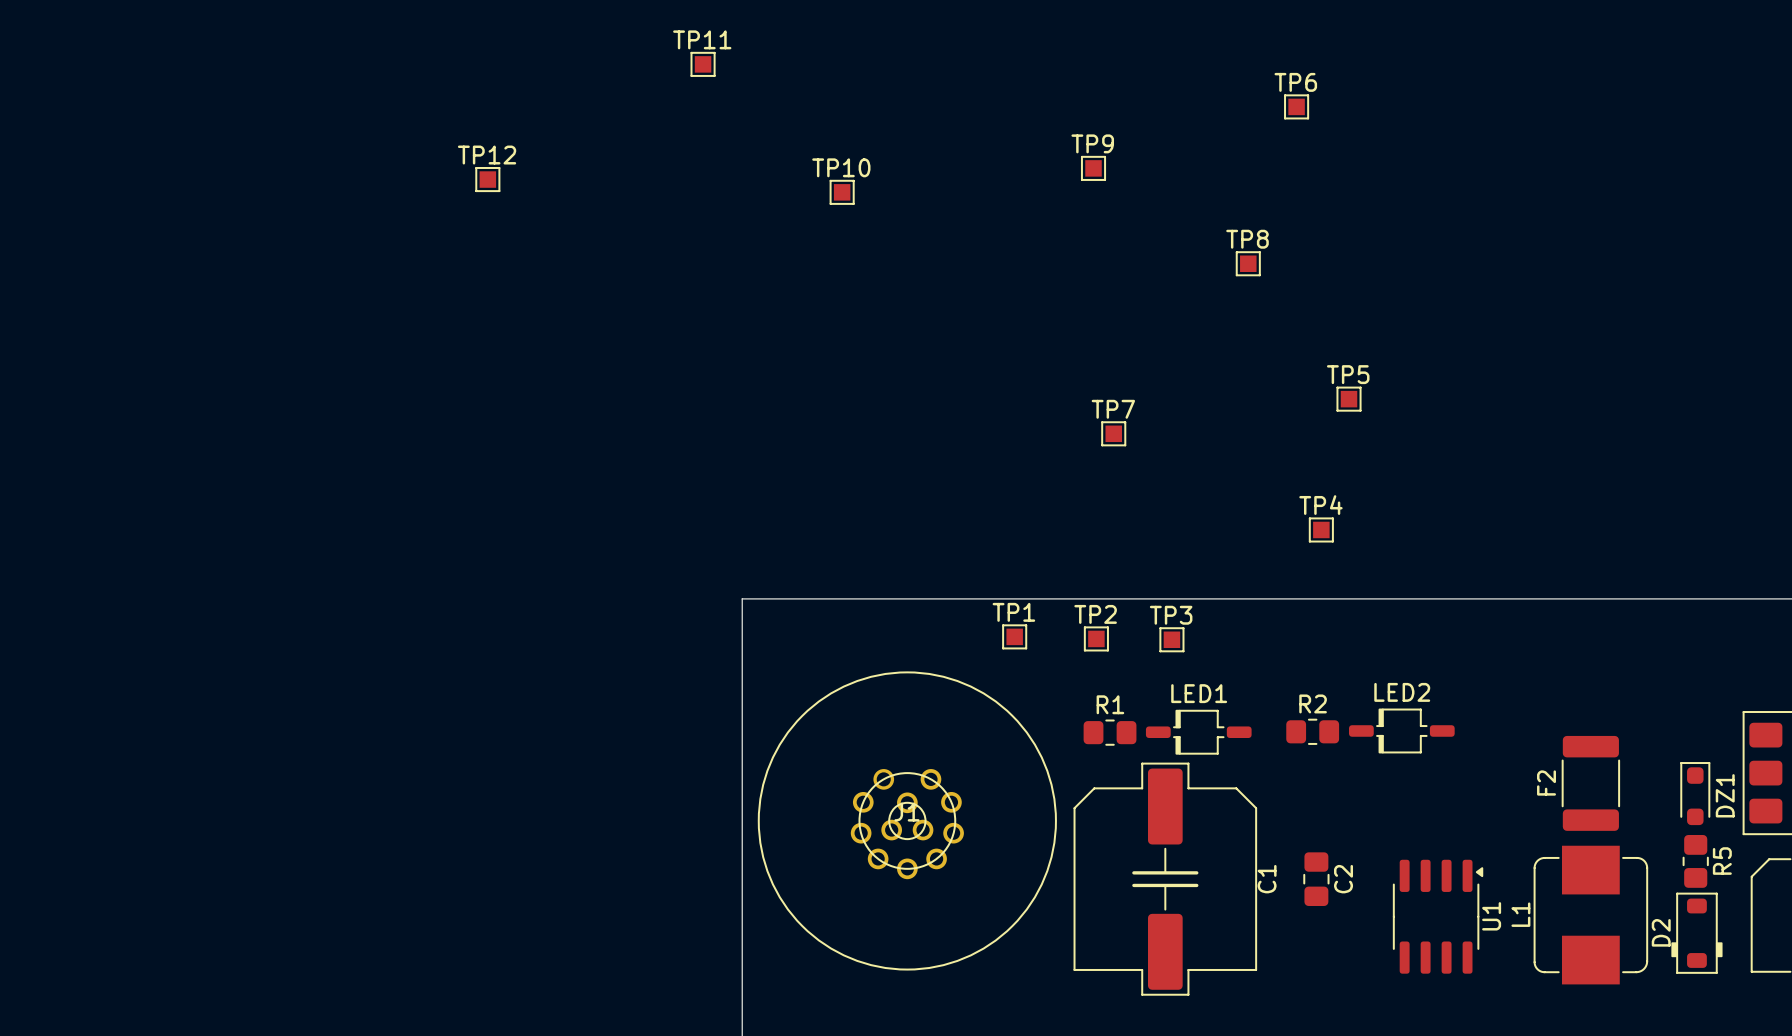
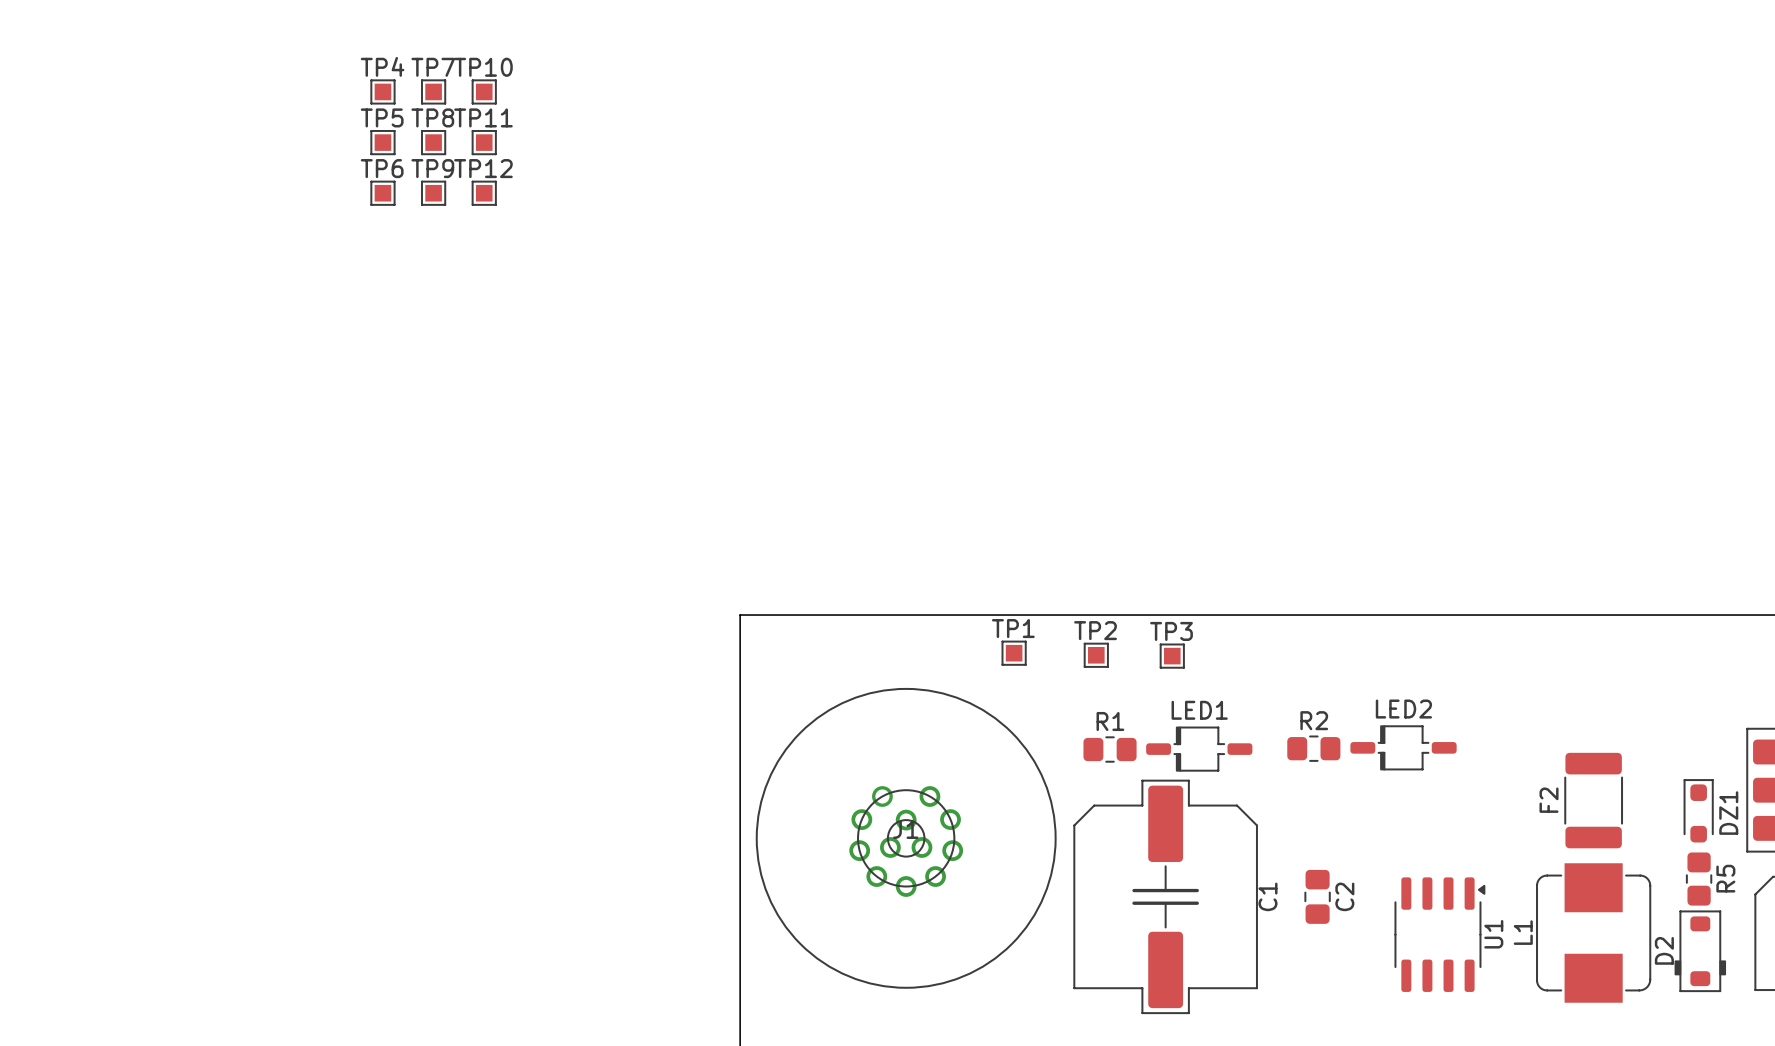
TP11 position: (703, 64) -> (484, 142)
TP6 position: (1296, 106) -> (382, 193)
TP9 position: (1093, 168) -> (433, 193)
TP10 position: (842, 192) -> (484, 91)
TP8 position: (1248, 263) -> (433, 142)
TP5 position: (1349, 399) -> (382, 142)
TP7 position: (1113, 433) -> (433, 91)
TP4 position: (1321, 529) -> (382, 91)

